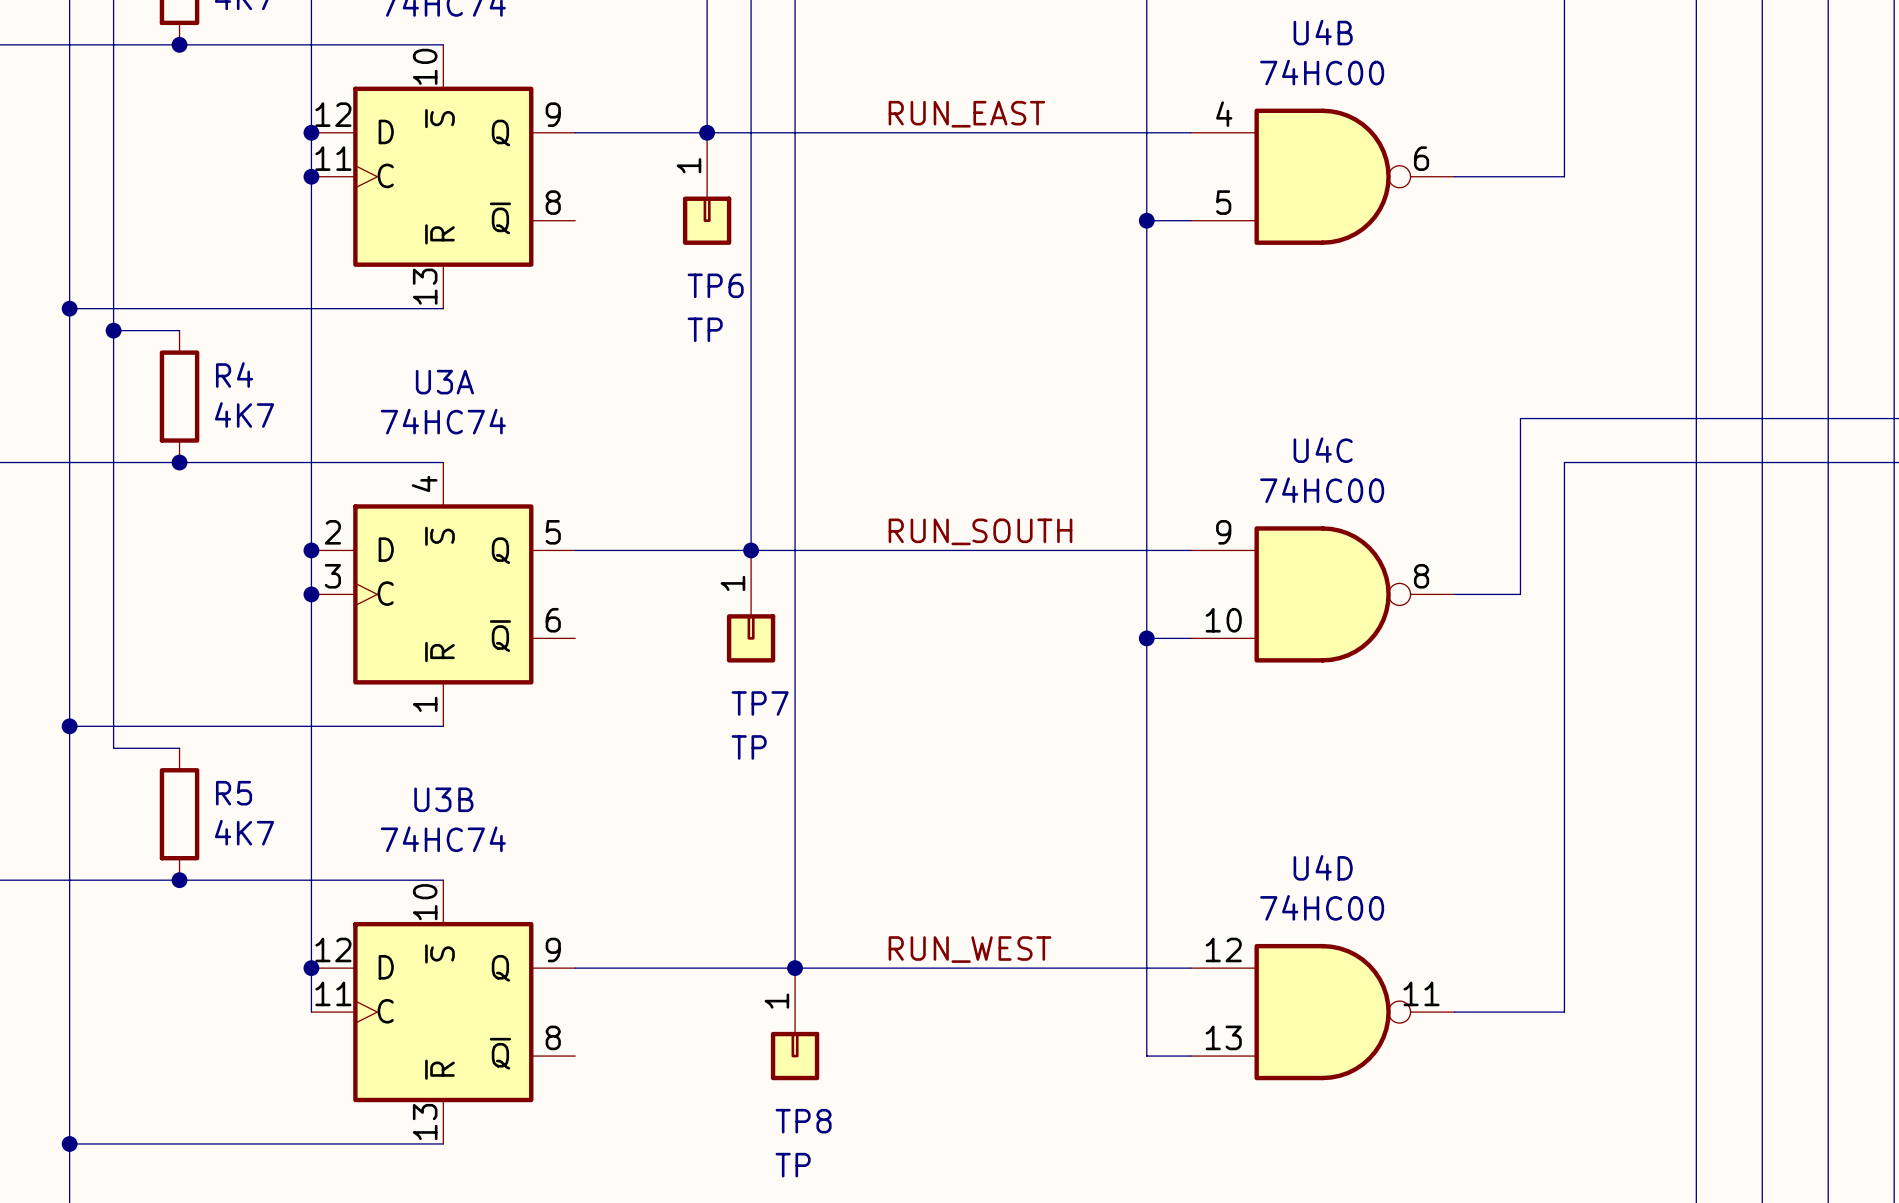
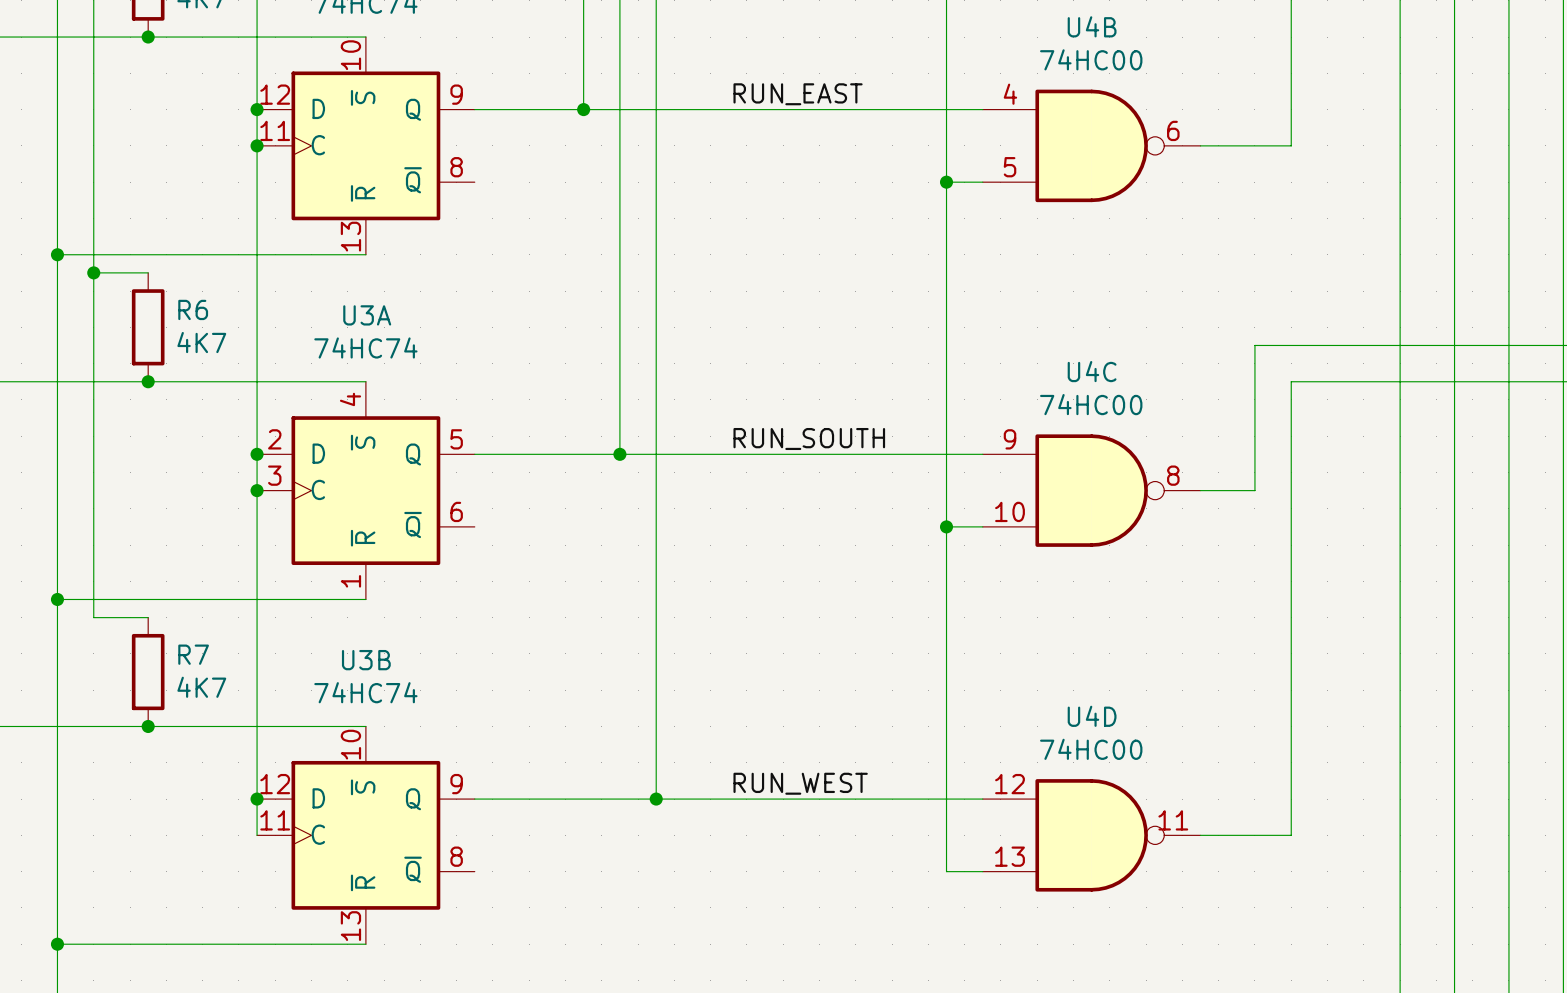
TP6: TP (707, 188) -> none
R4 name: R4 (234, 375) -> R6 (193, 309)
TP7: TP (751, 606) -> none
R5 name: R5 (234, 793) -> R7 (193, 654)
TP8: TP (795, 1024) -> none

